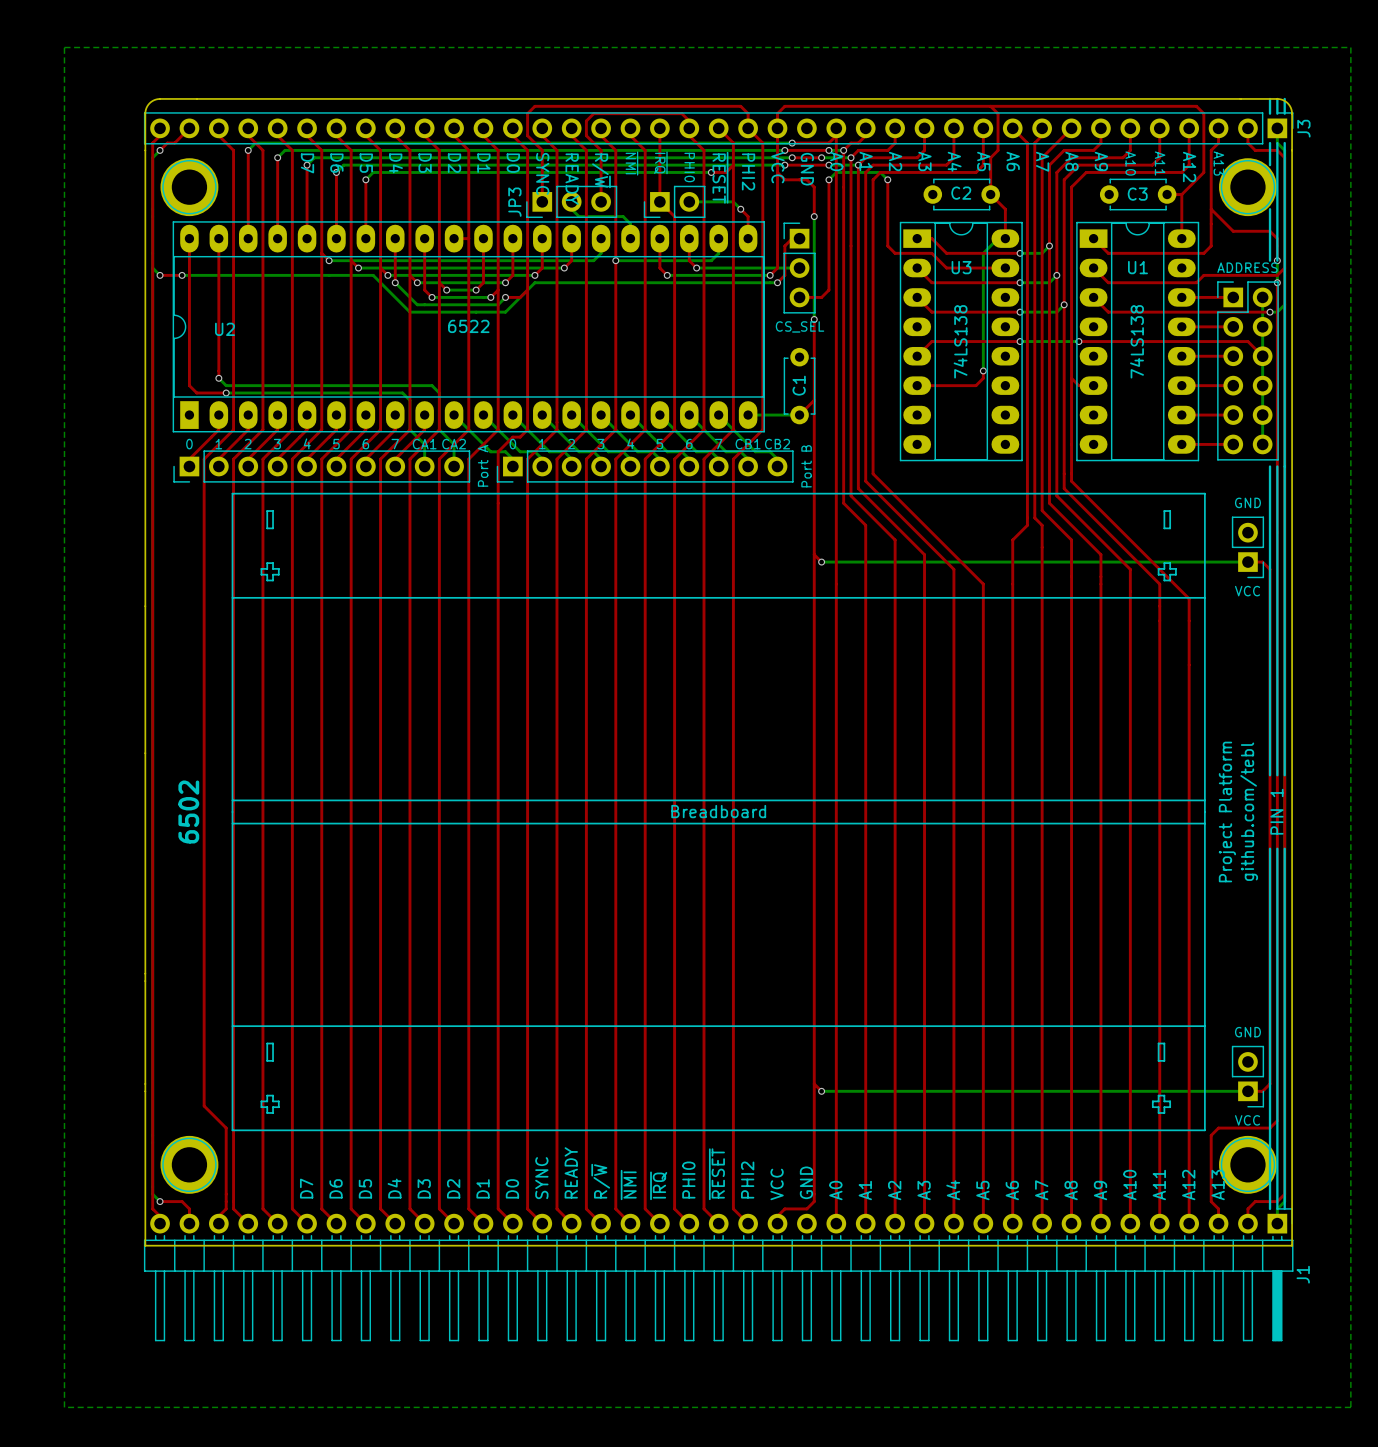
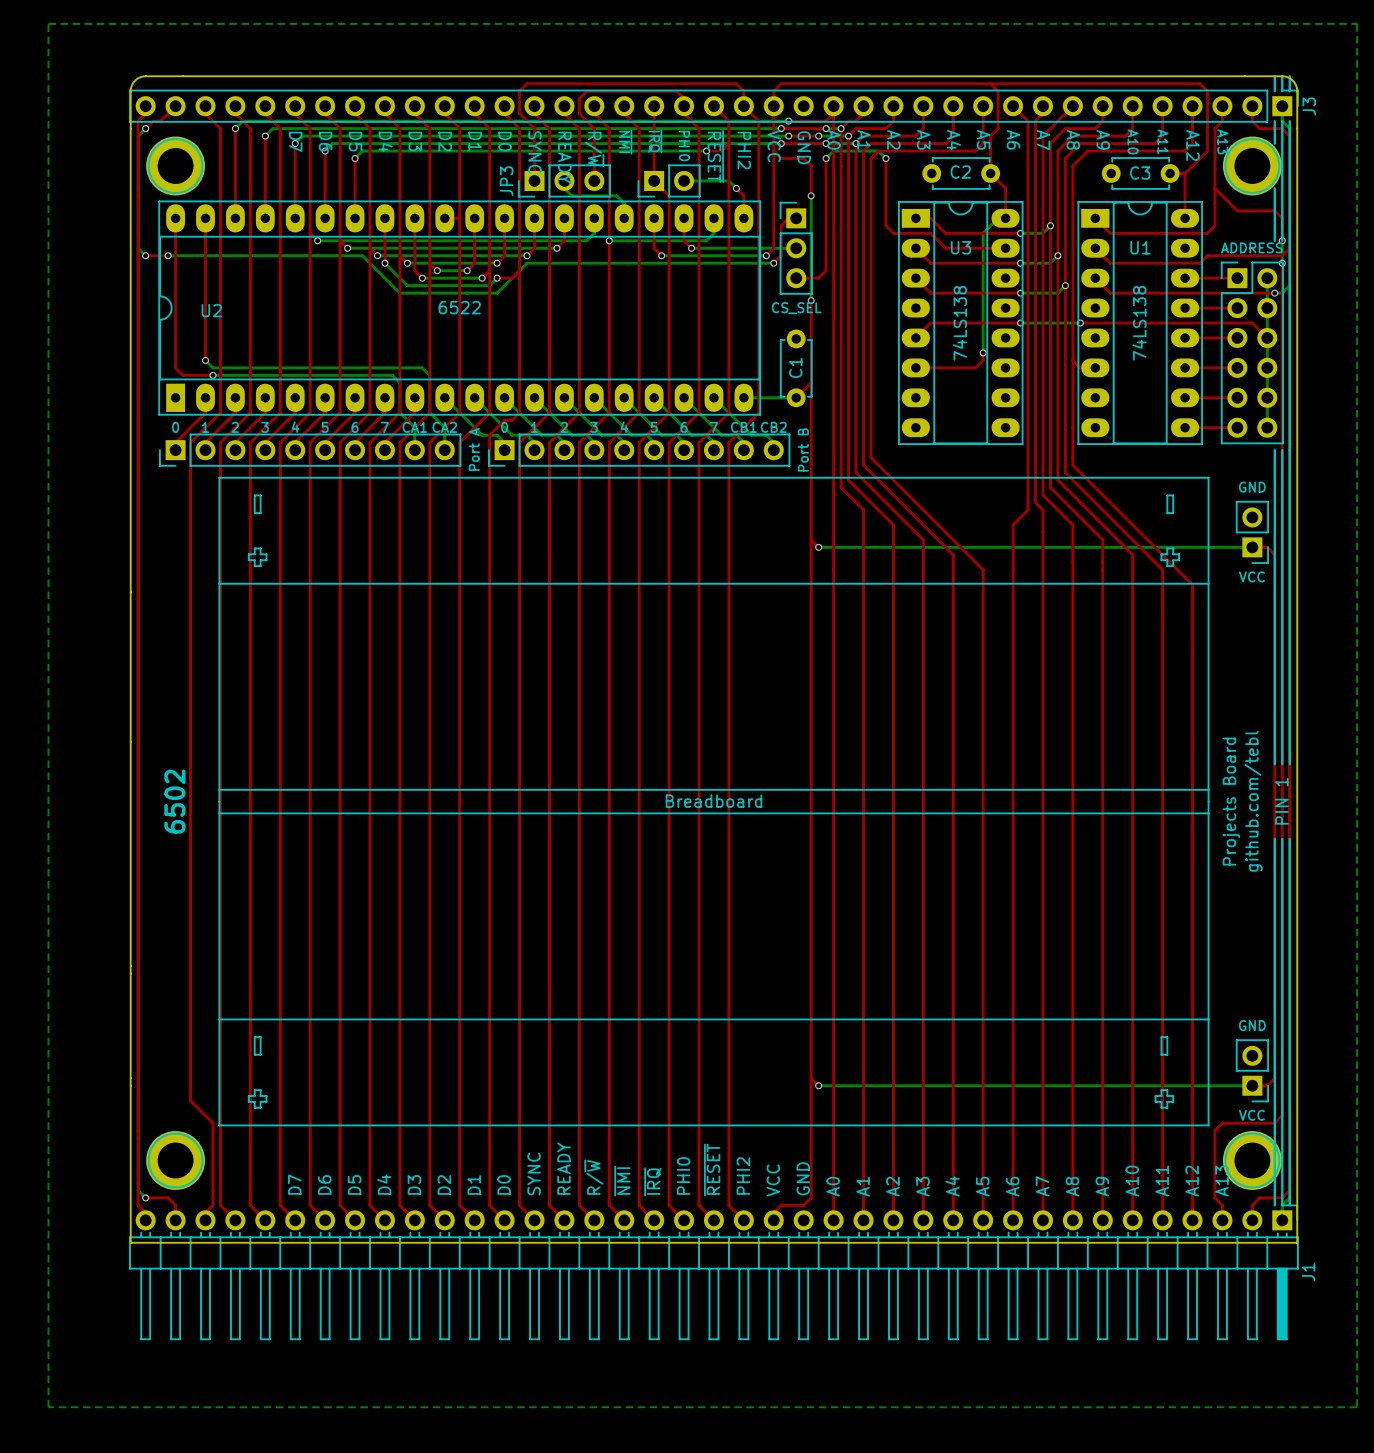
text: Project Platform (1227, 811) -> Projects Board (1231, 801)

